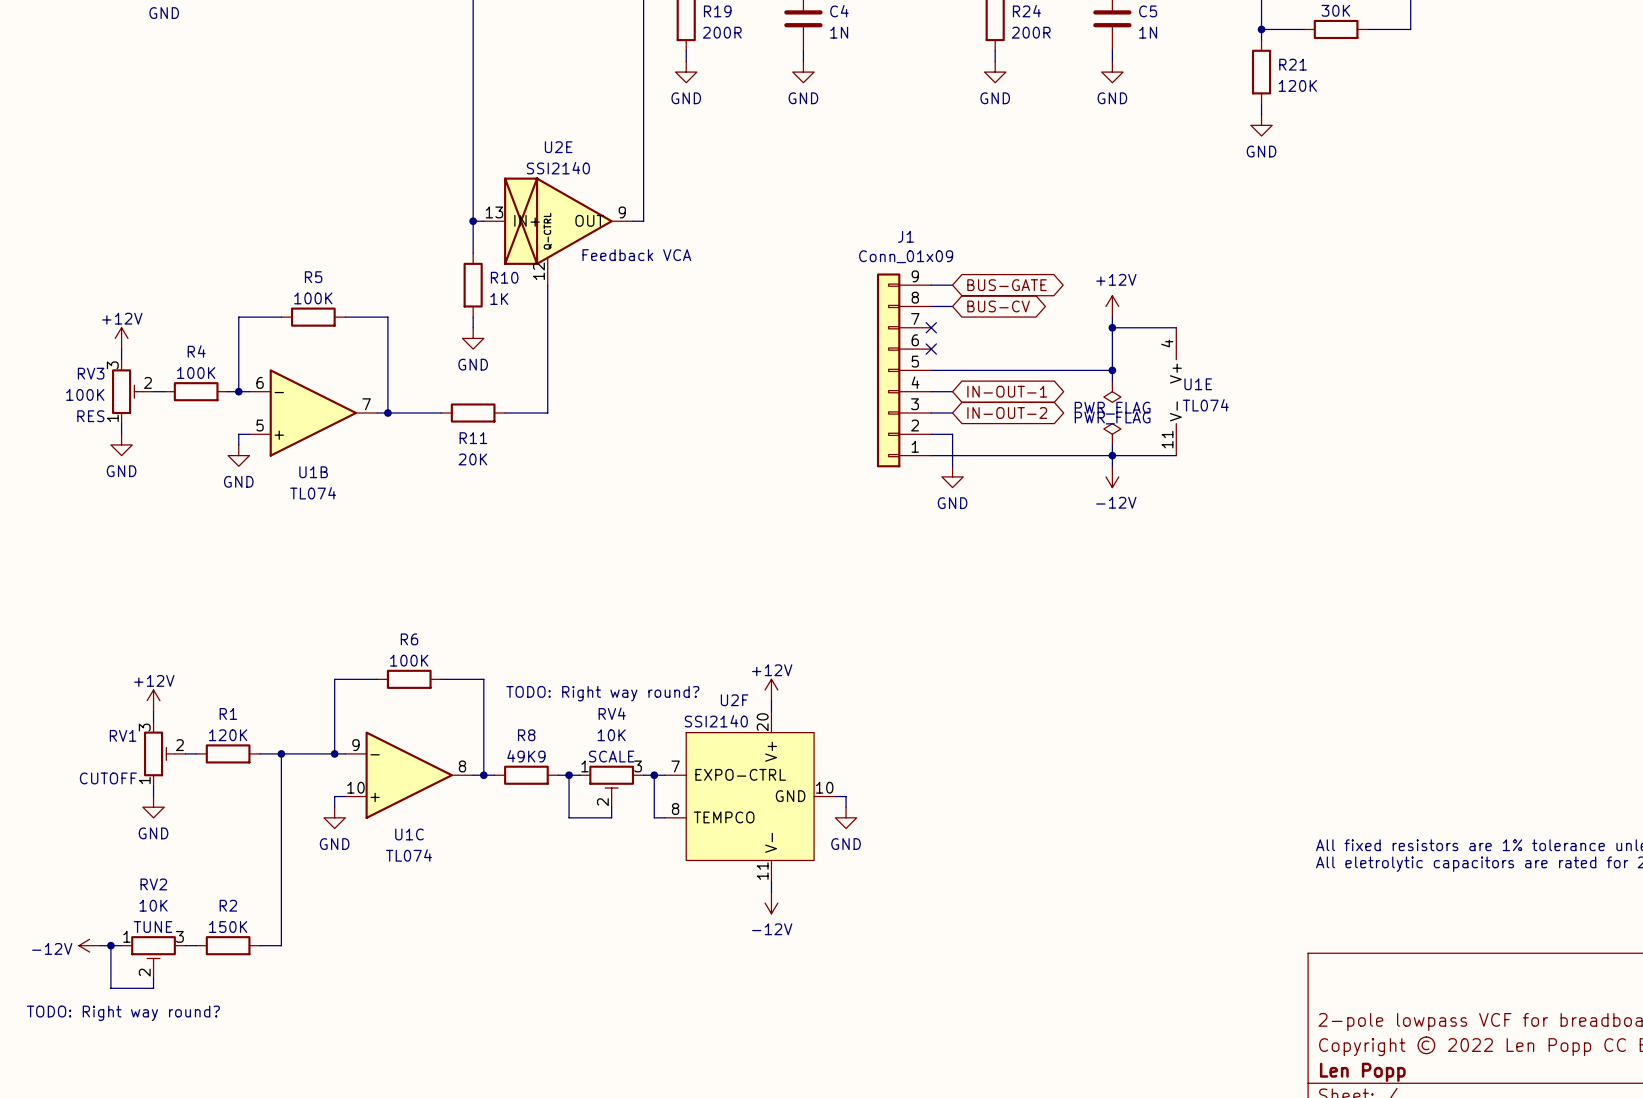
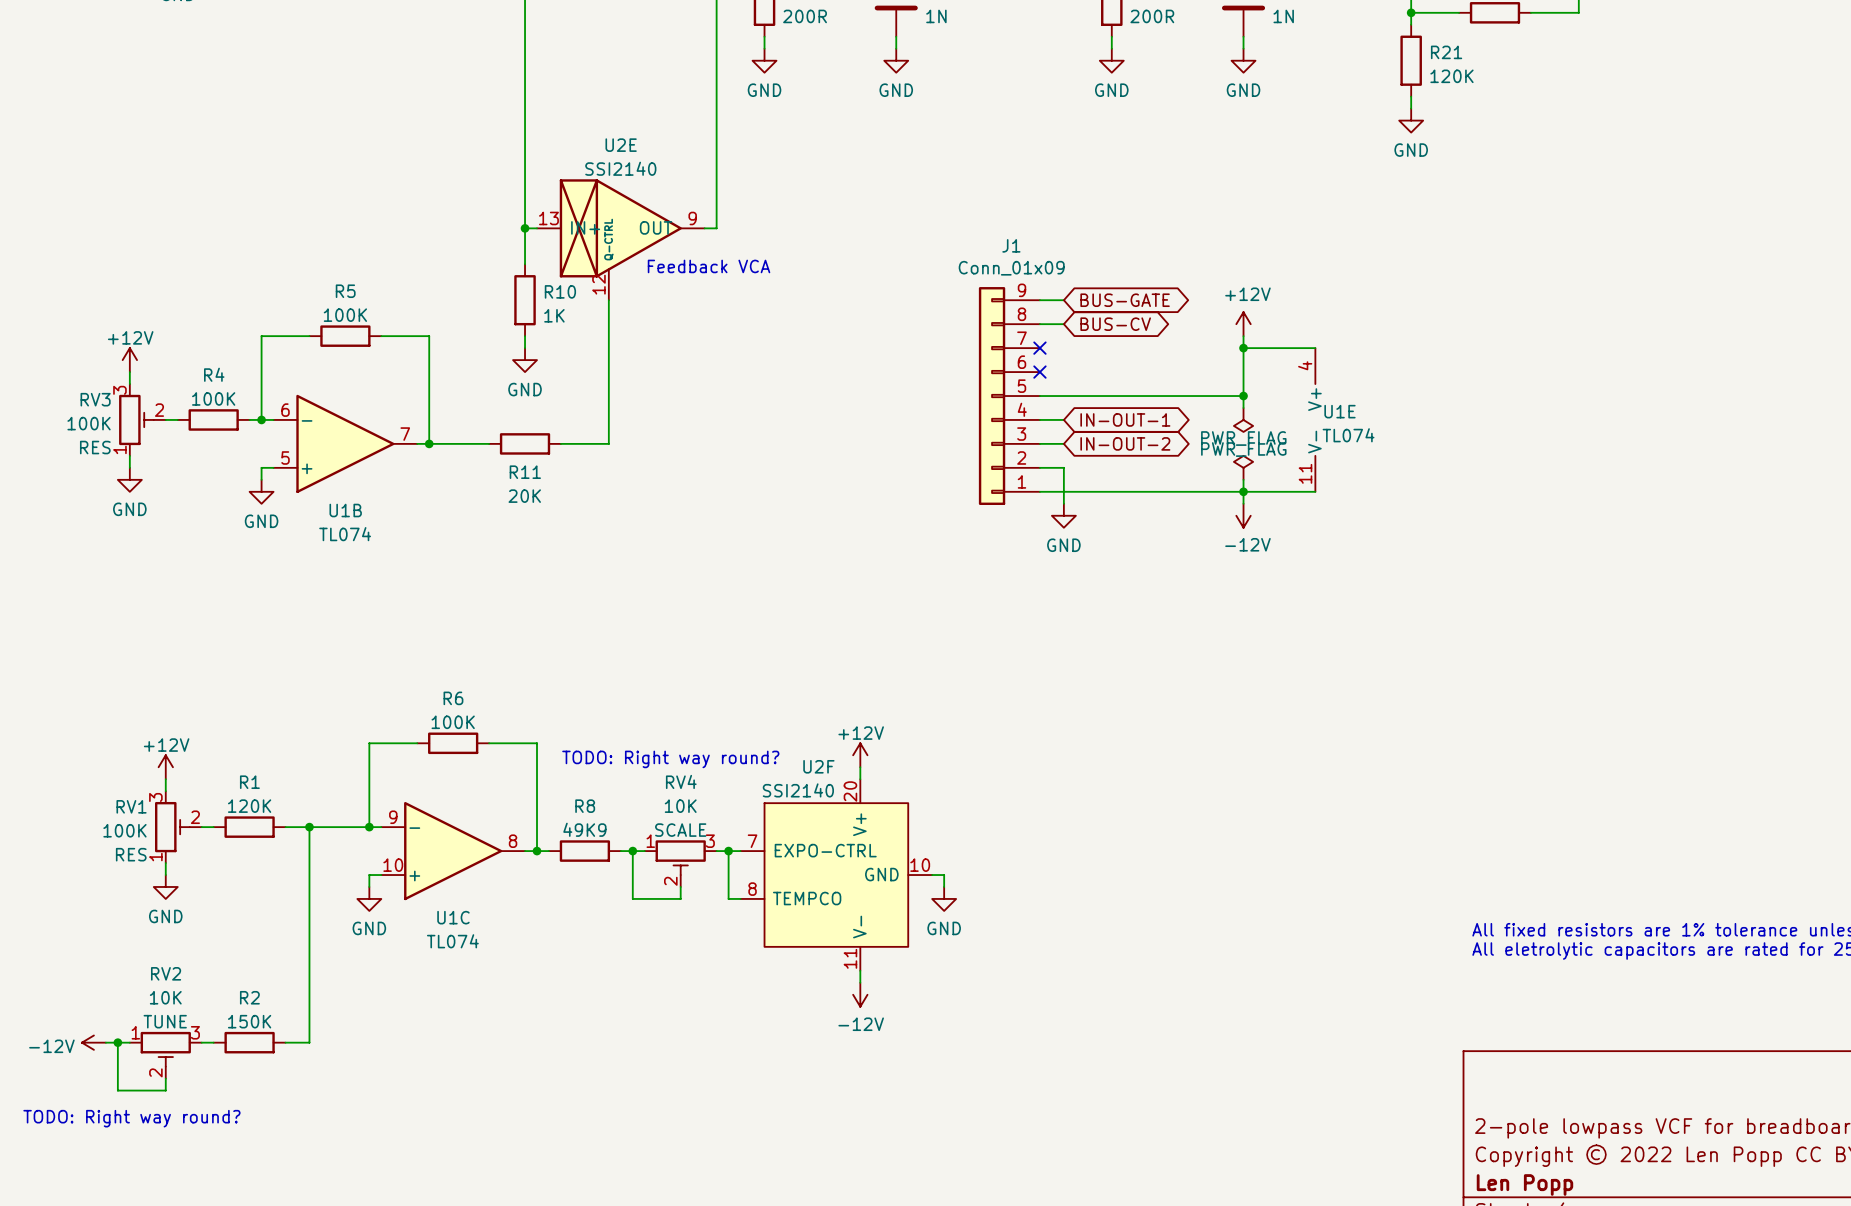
RV1 value: none -> 100K (124, 830)
RV1 text: CUTOFF (108, 778) -> RES (131, 854)

